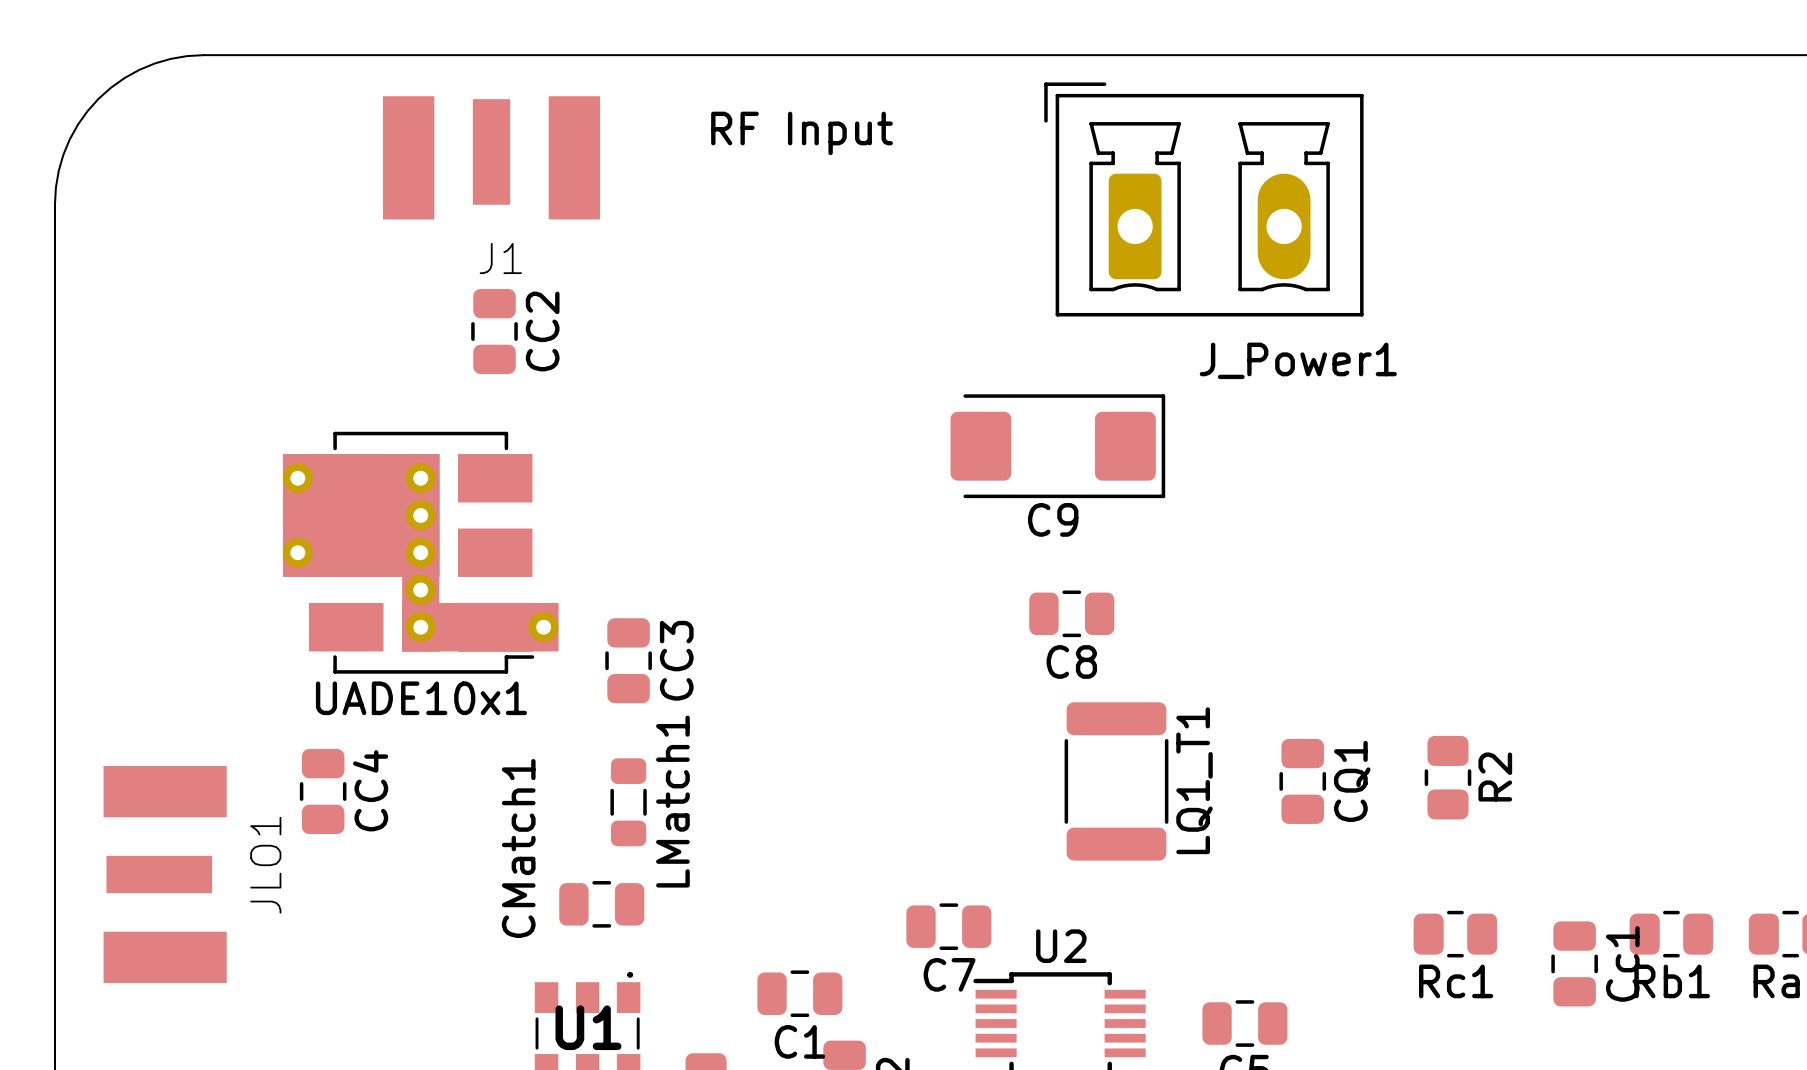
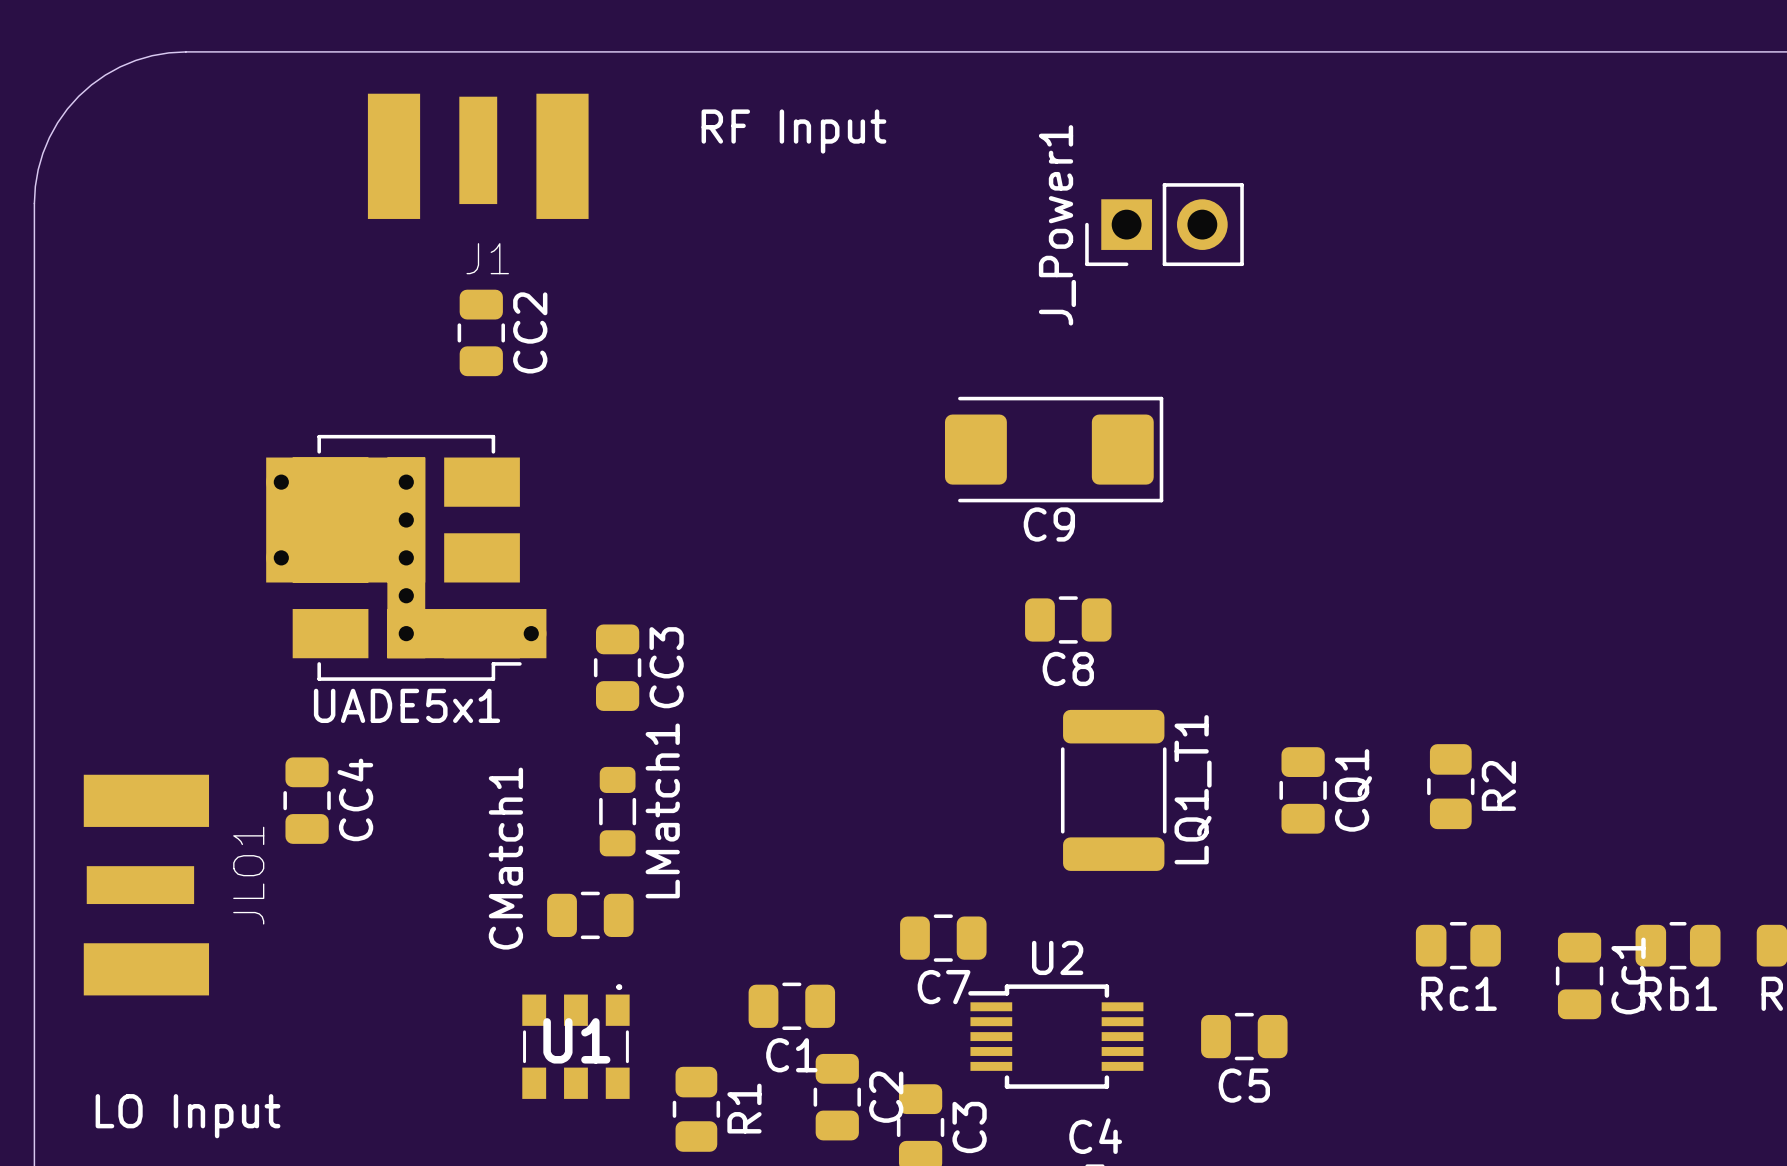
J_Power1 footprint: [1044, 82, 1364, 317] -> [1085, 183, 1244, 267]
J_Power1 name position: J_Power1 (1298, 360) -> J_Power1 (1057, 225)
UADE10x1 name: UADE10x1 (421, 698) -> UADE5x1 (407, 705)

